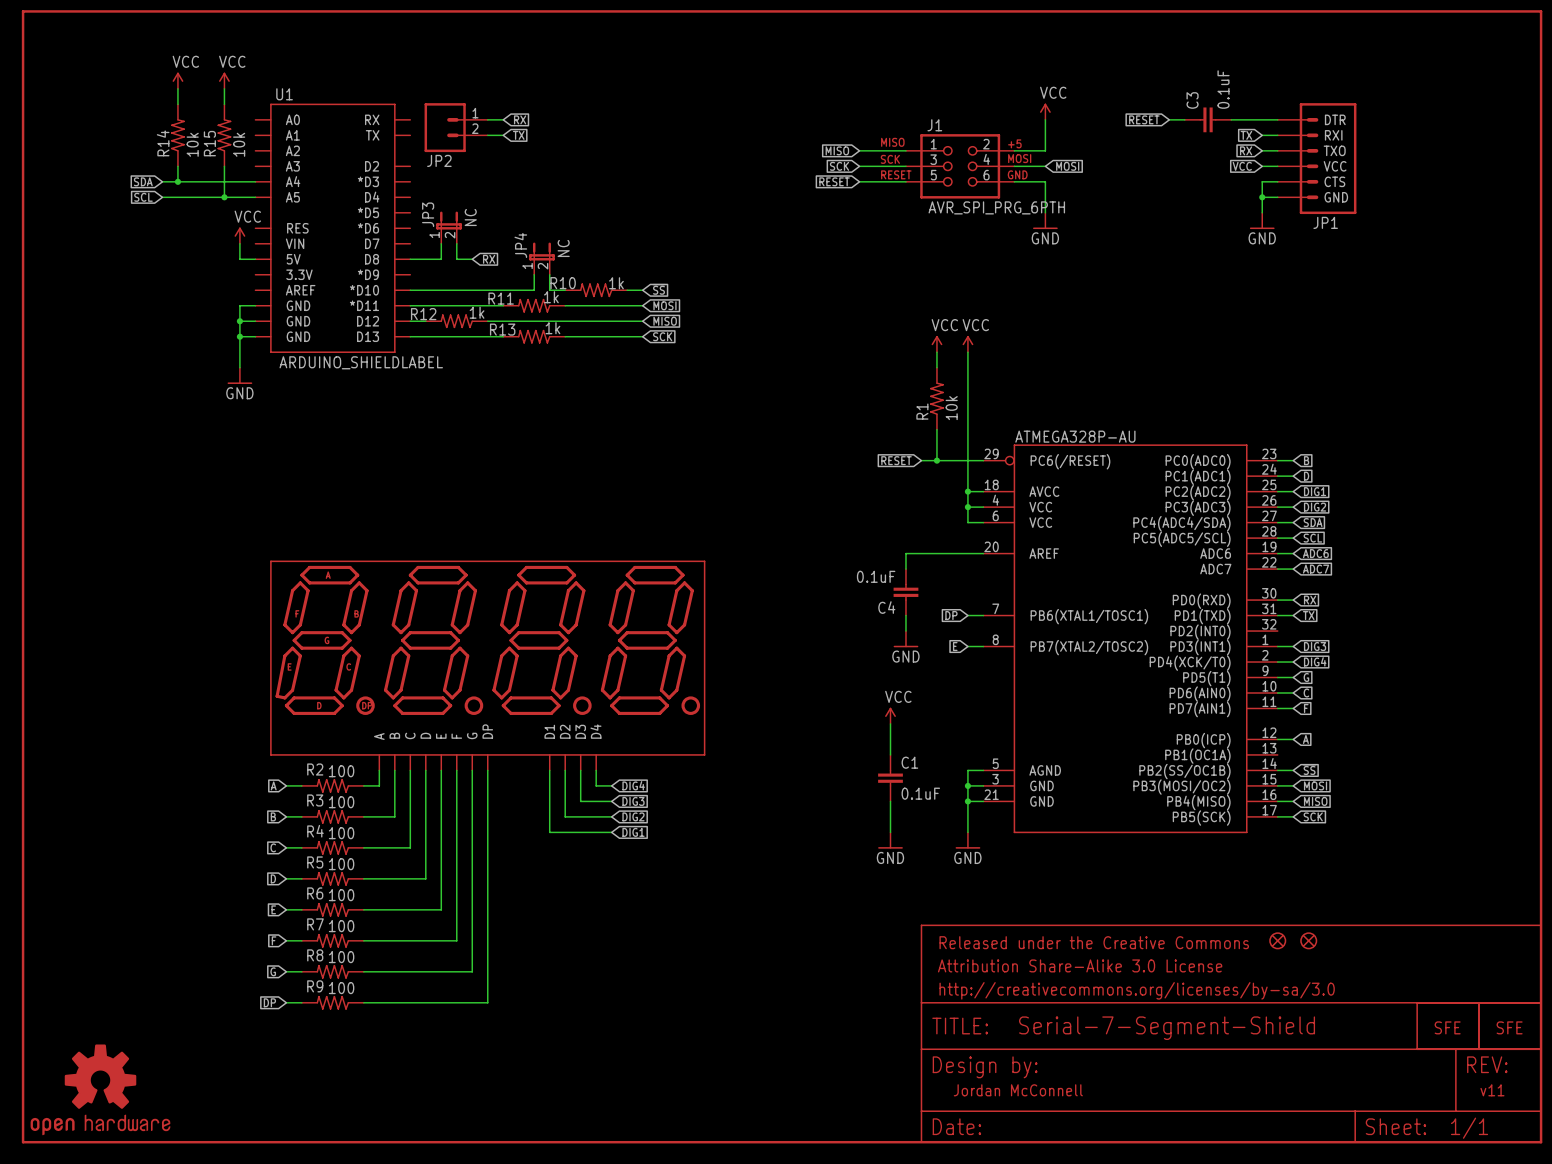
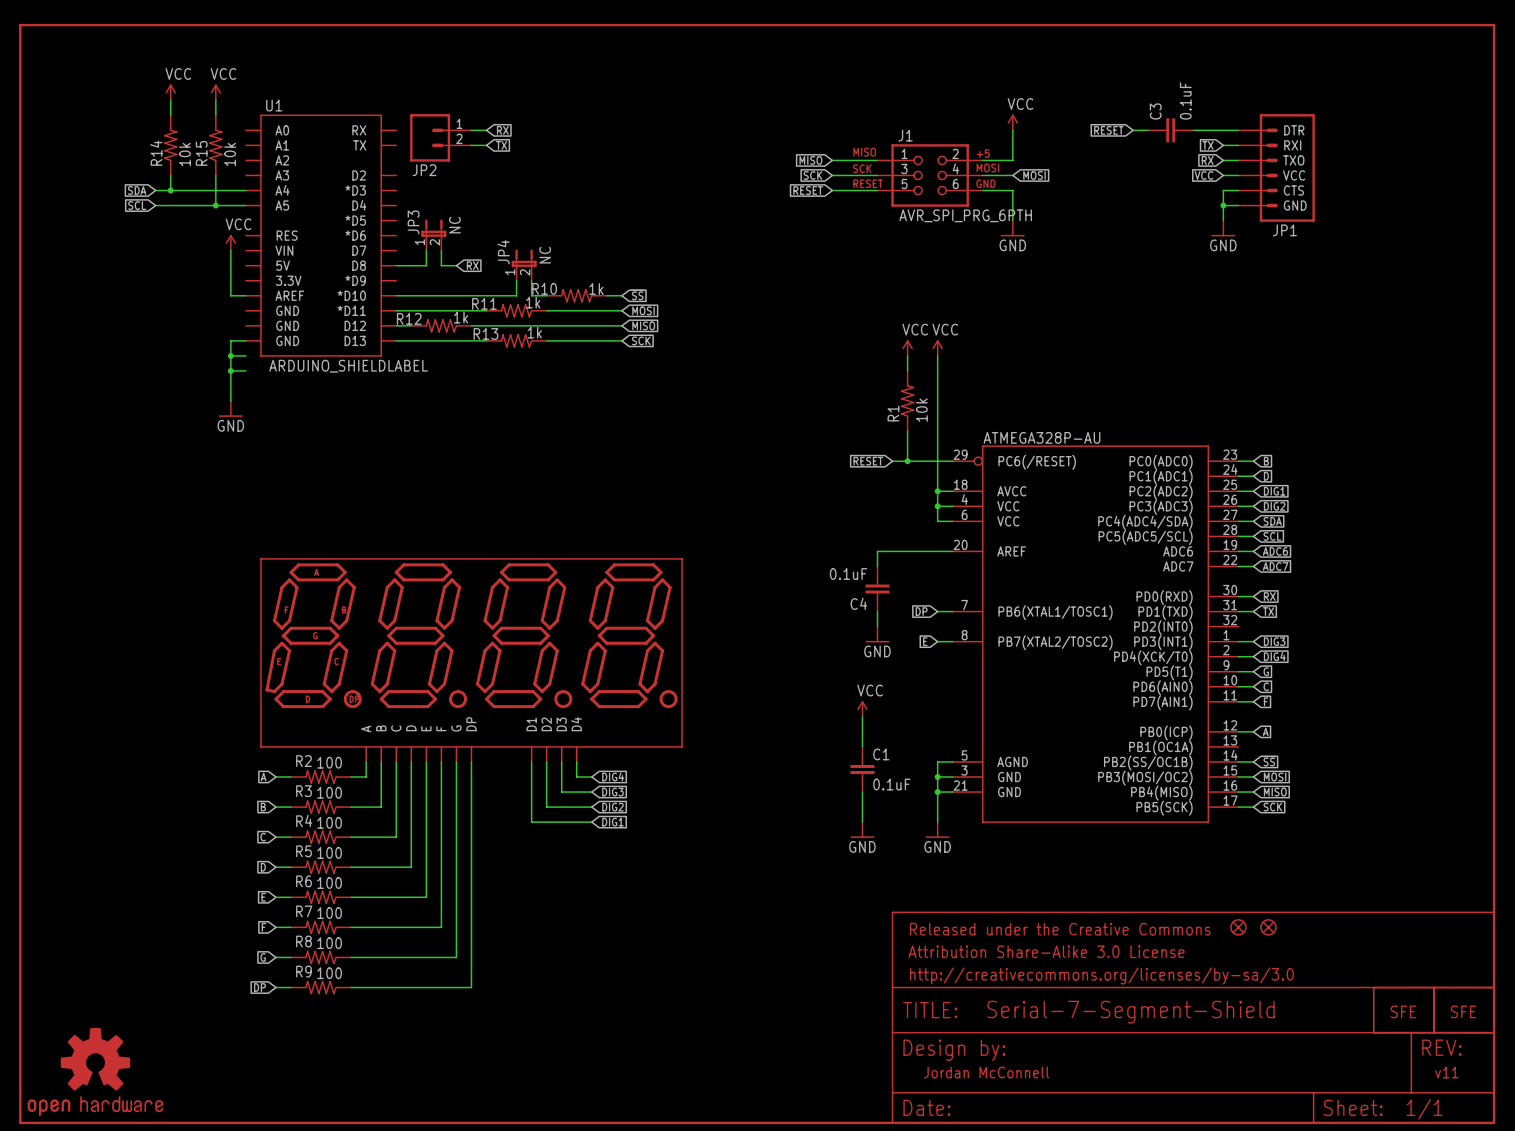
wire: (239, 259) (255, 259) -> (230, 265) (230, 295) (245, 295)
wire: (255, 305) (239, 305) (239, 336) -> (245, 370) (230, 370) (230, 401)
wire: (239, 321) (255, 321) -> (230, 355) (245, 355)
junction: (239, 321) -> none
junction: (239, 336) -> none
junction: none -> (230, 355)
junction: none -> (230, 370)
power symbol position: GND (239, 375) -> GND (230, 408)

